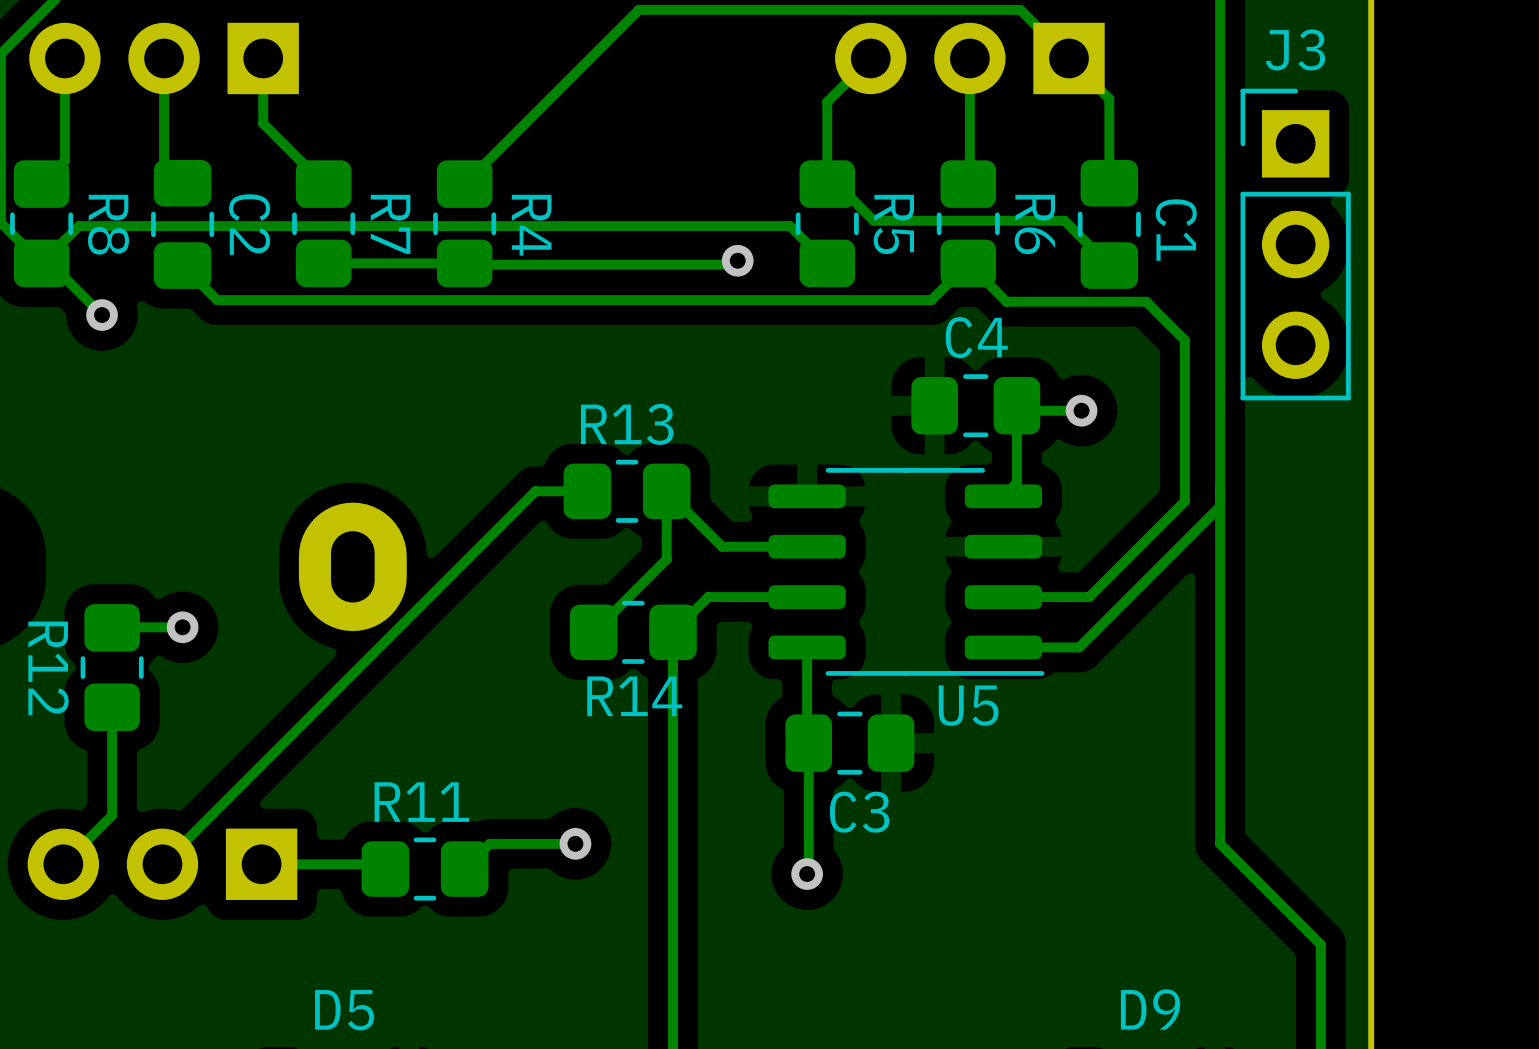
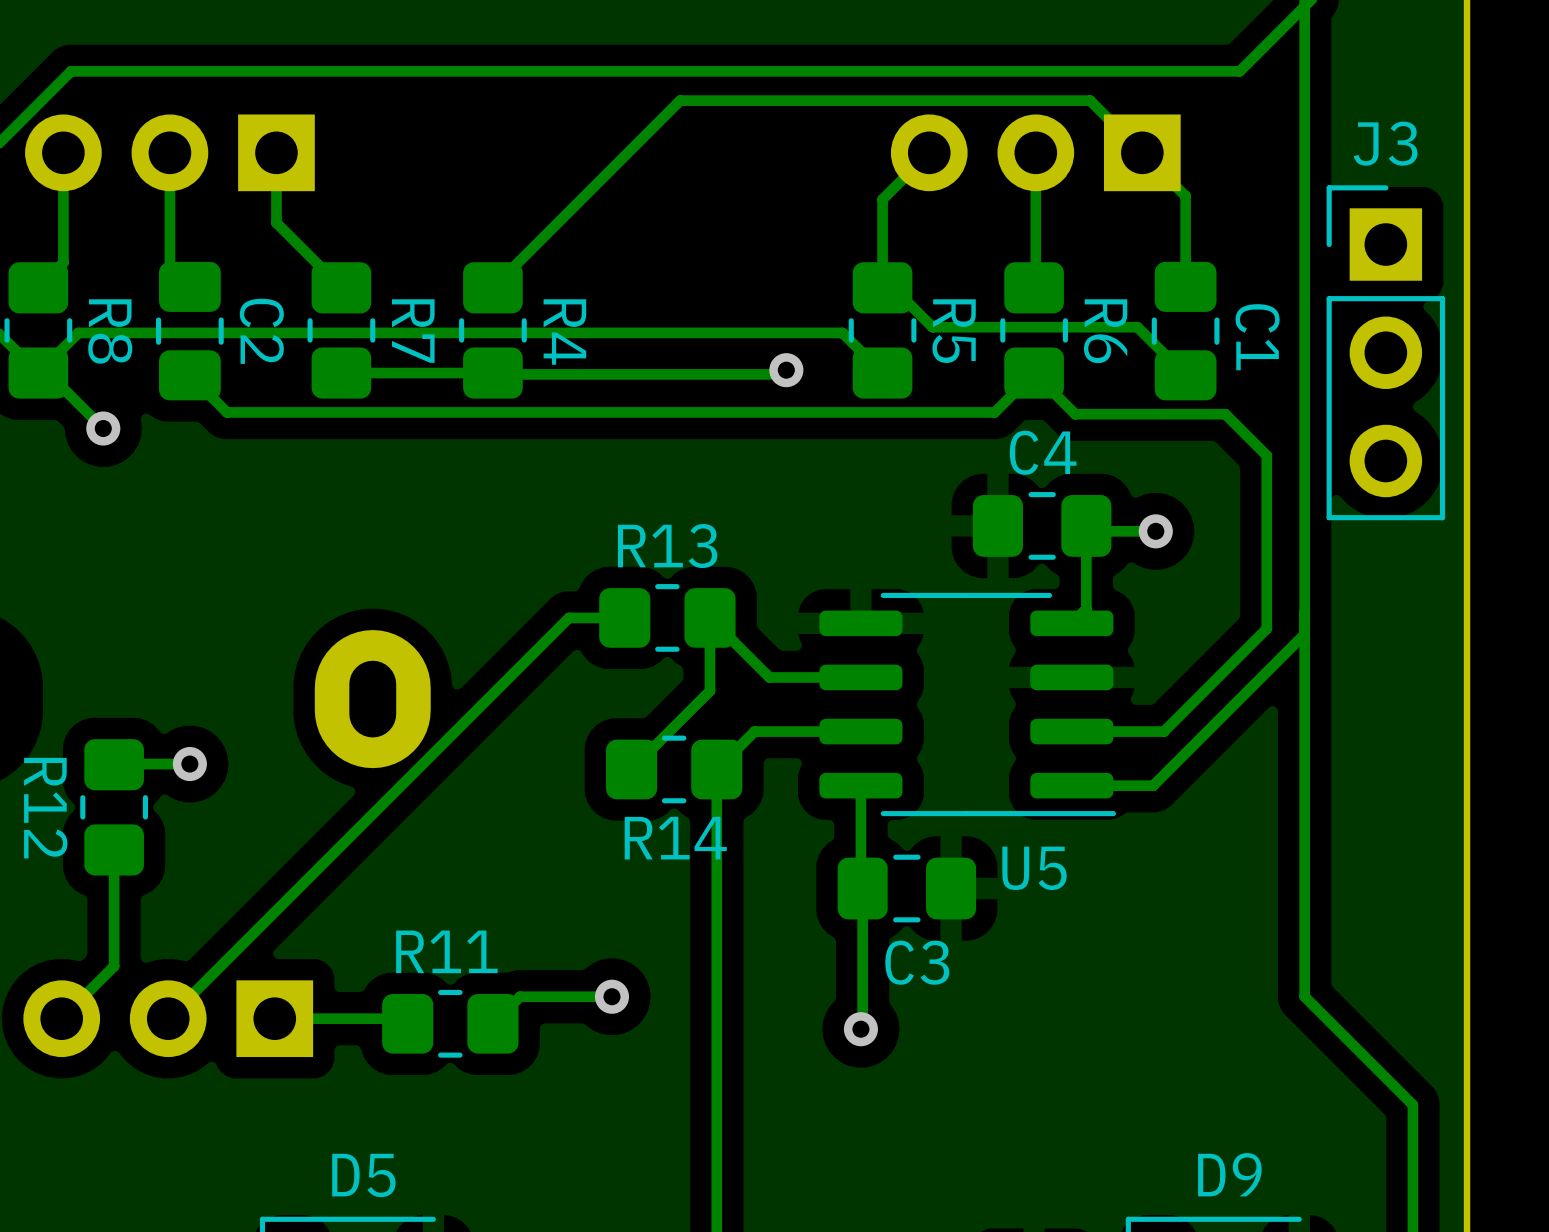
U5 name position: U5 (968, 705) -> U5 (1034, 868)

